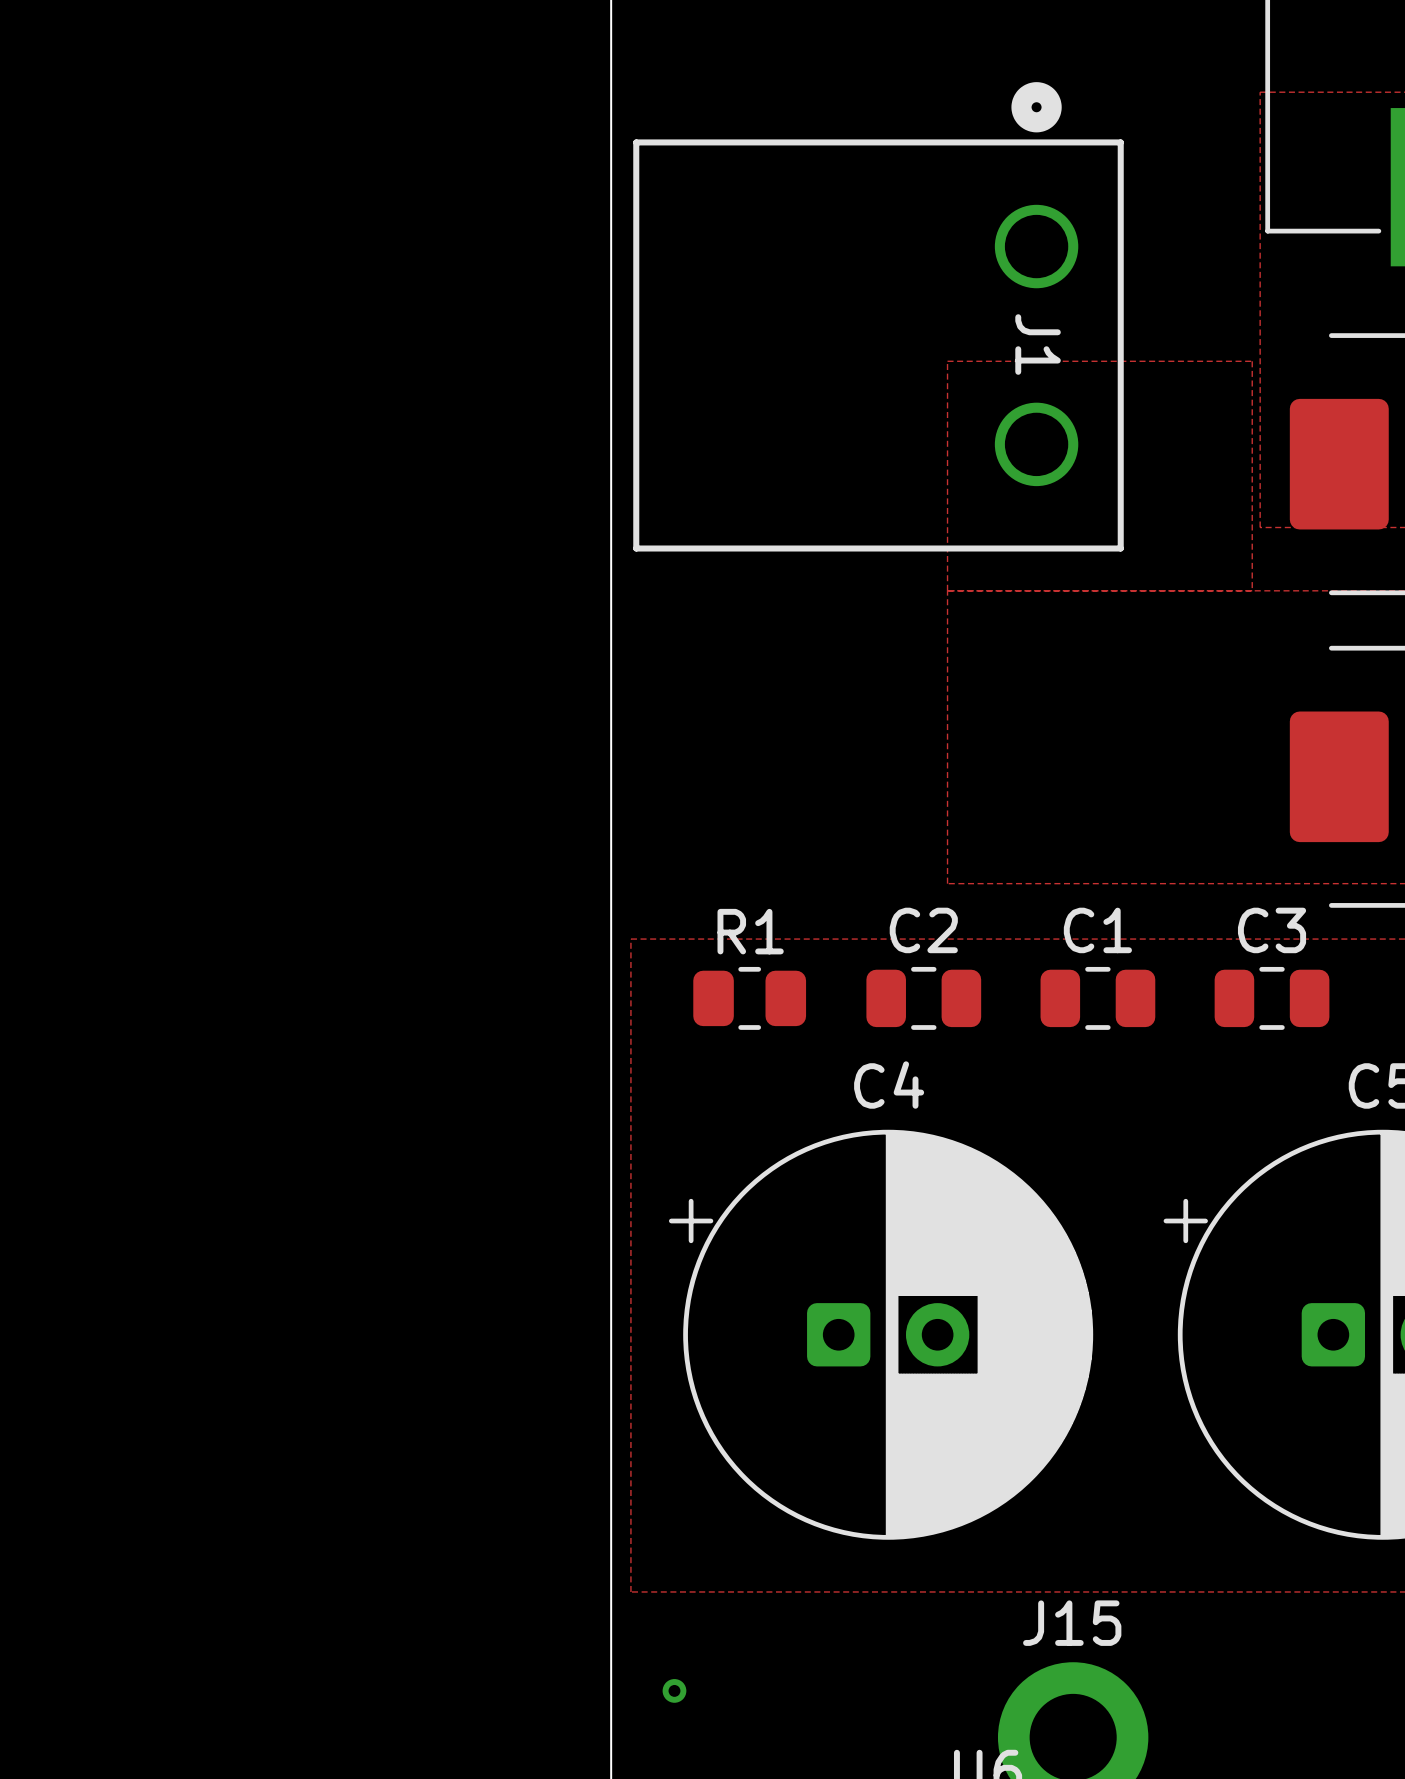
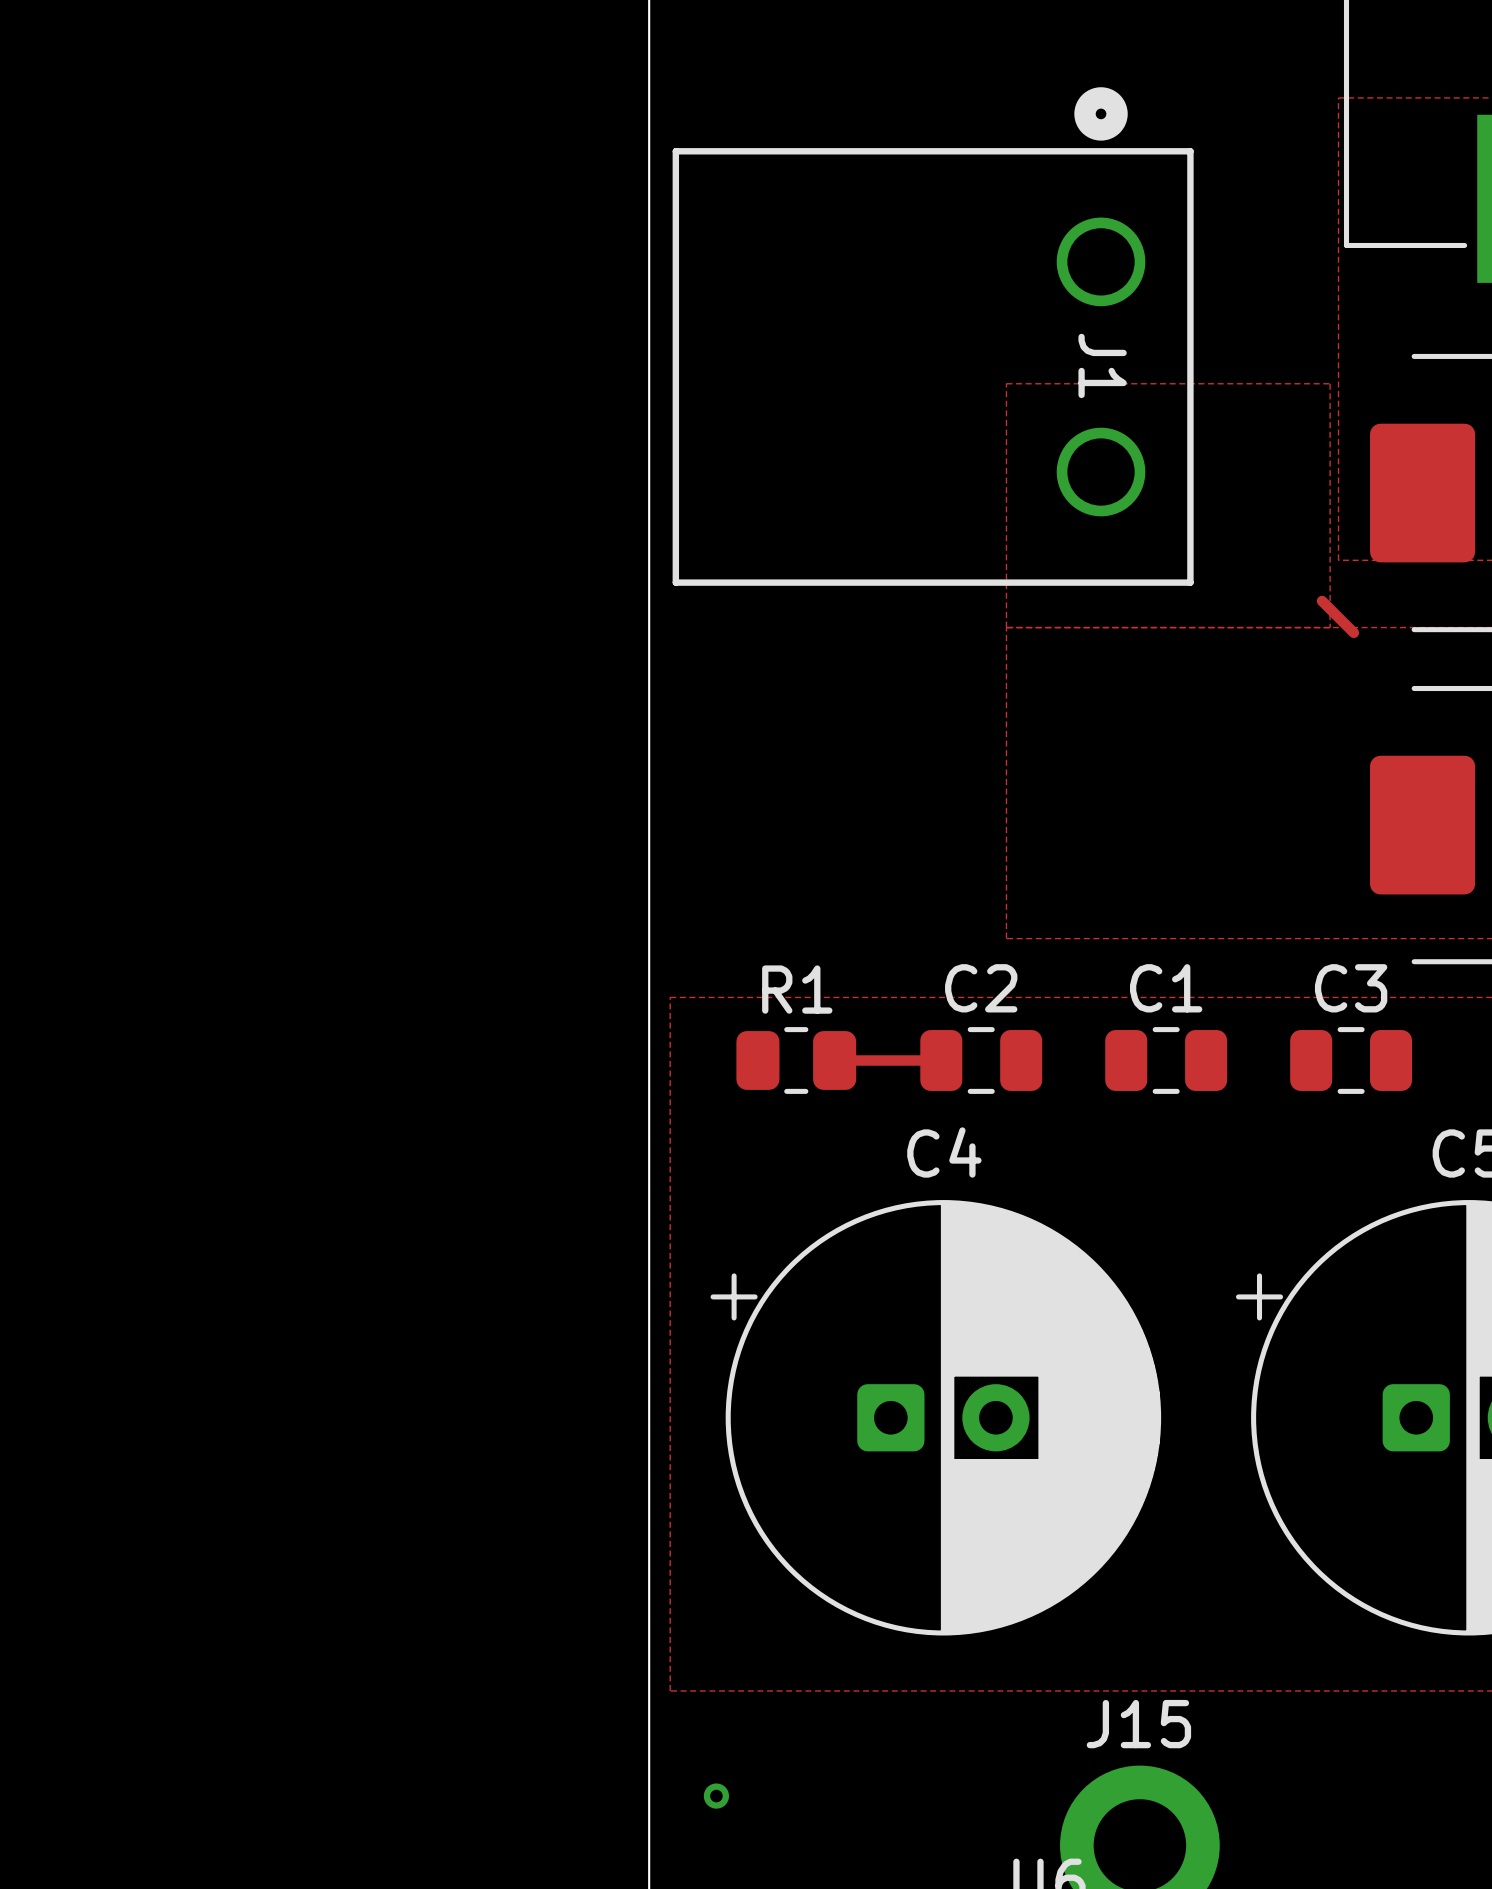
track: none -> (1322, 601) (1353, 632)
track: none -> (834, 1060) (941, 1060)

